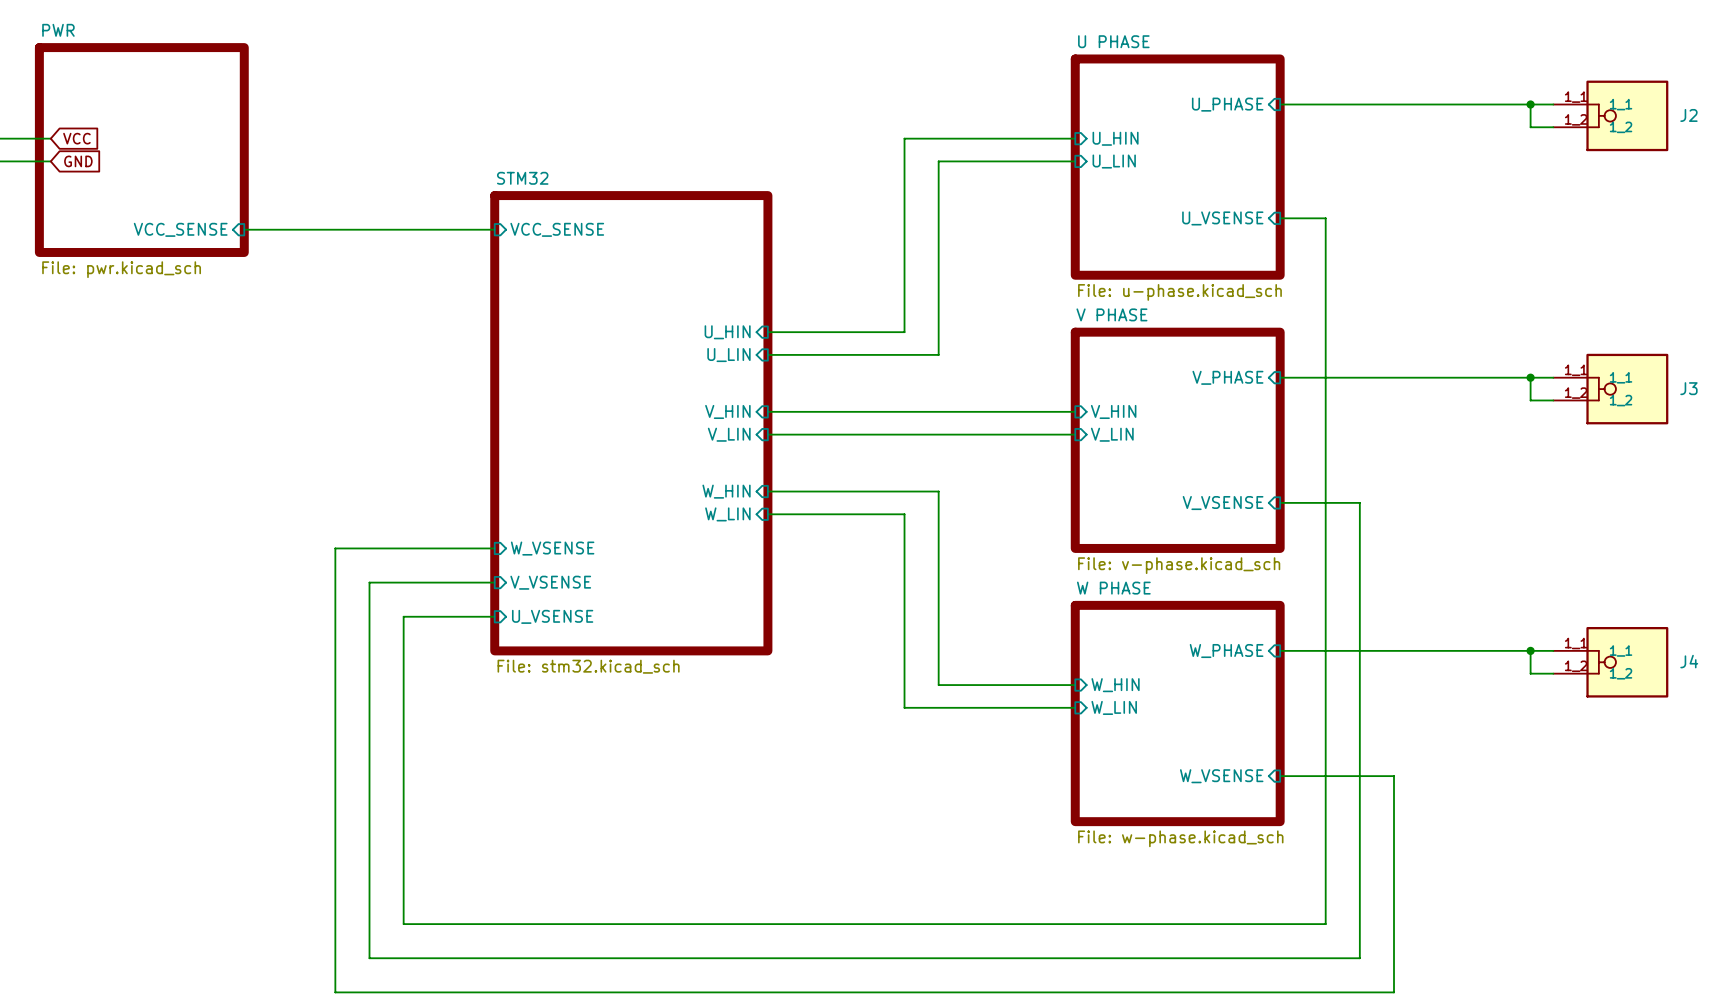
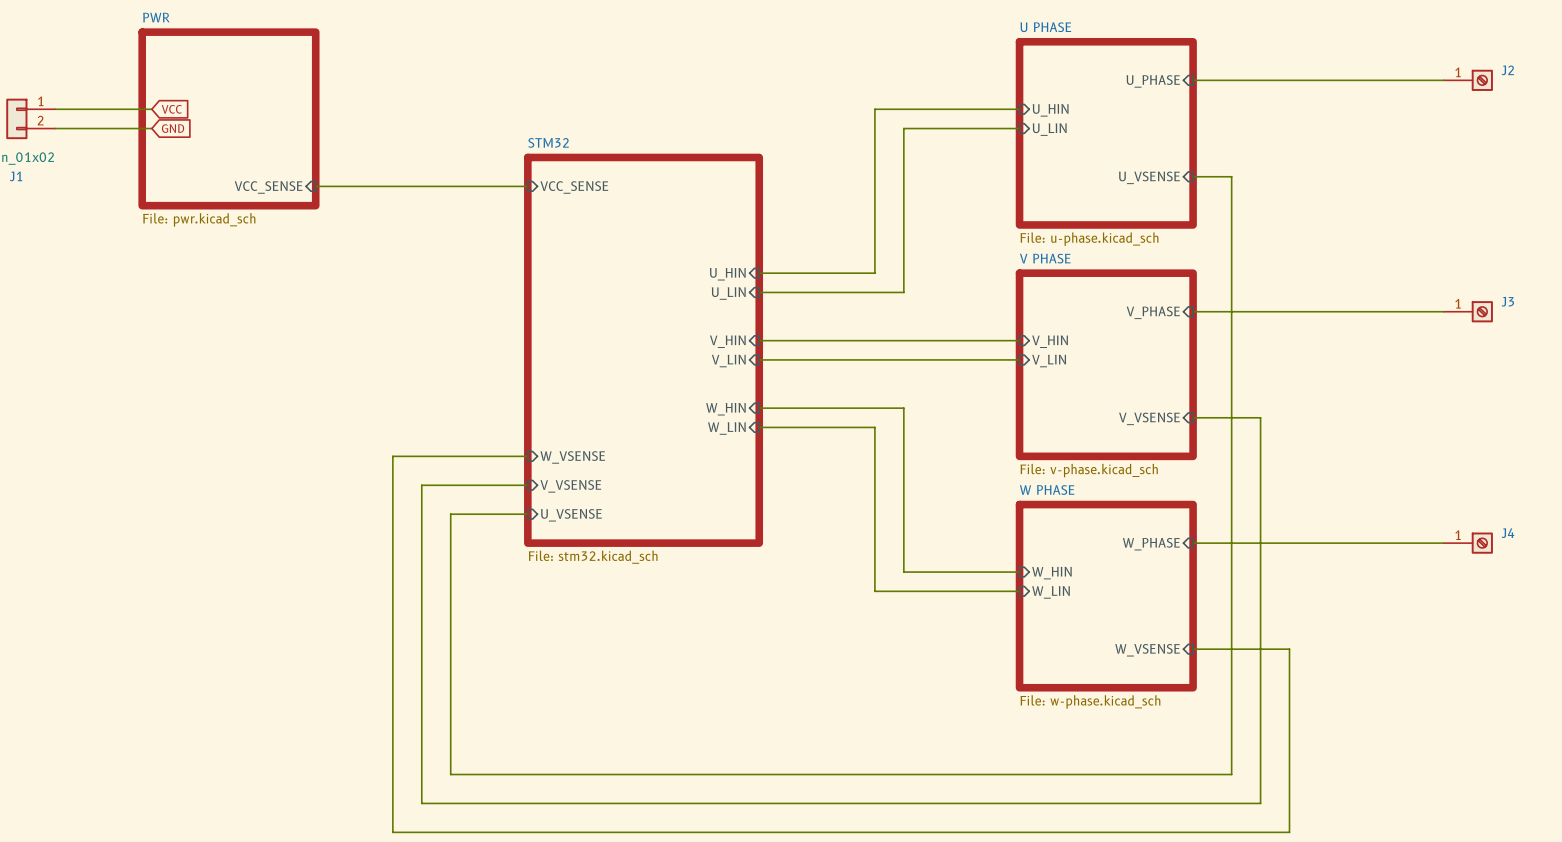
J2 symbol: [1553, 80, 1669, 152] -> [1443, 69, 1493, 91]
wire: (1530, 104) (1530, 127) (1553, 127) -> none
junction: (1530, 104) -> none
J2 name position: J2 (1688, 115) -> J2 (1507, 70)
J3 symbol: [1553, 353, 1669, 425] -> [1443, 301, 1493, 323]
wire: (1530, 377) (1530, 400) (1553, 400) -> none
junction: (1530, 377) -> none
J3 name position: J3 (1688, 388) -> J3 (1507, 301)
J4 symbol: [1553, 626, 1669, 698] -> [1443, 532, 1493, 554]
wire: (1530, 650) (1530, 673) (1553, 673) -> none
junction: (1530, 650) -> none
J4 name position: J4 (1689, 661) -> J4 (1507, 533)

